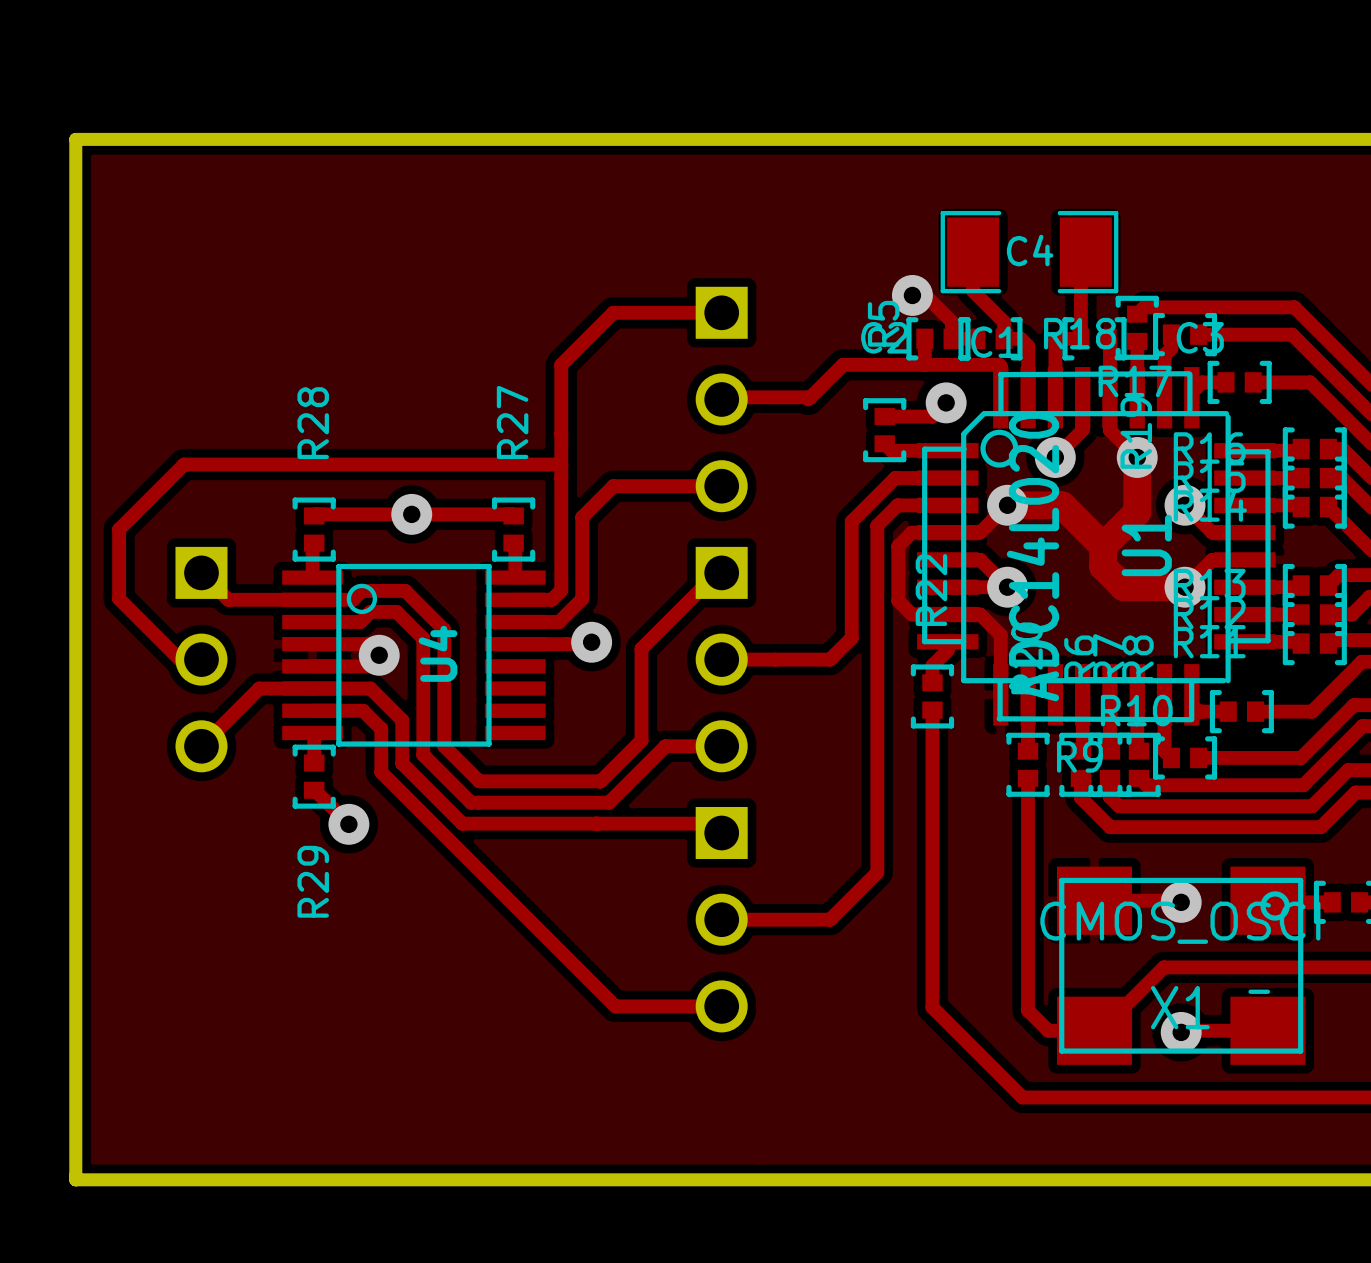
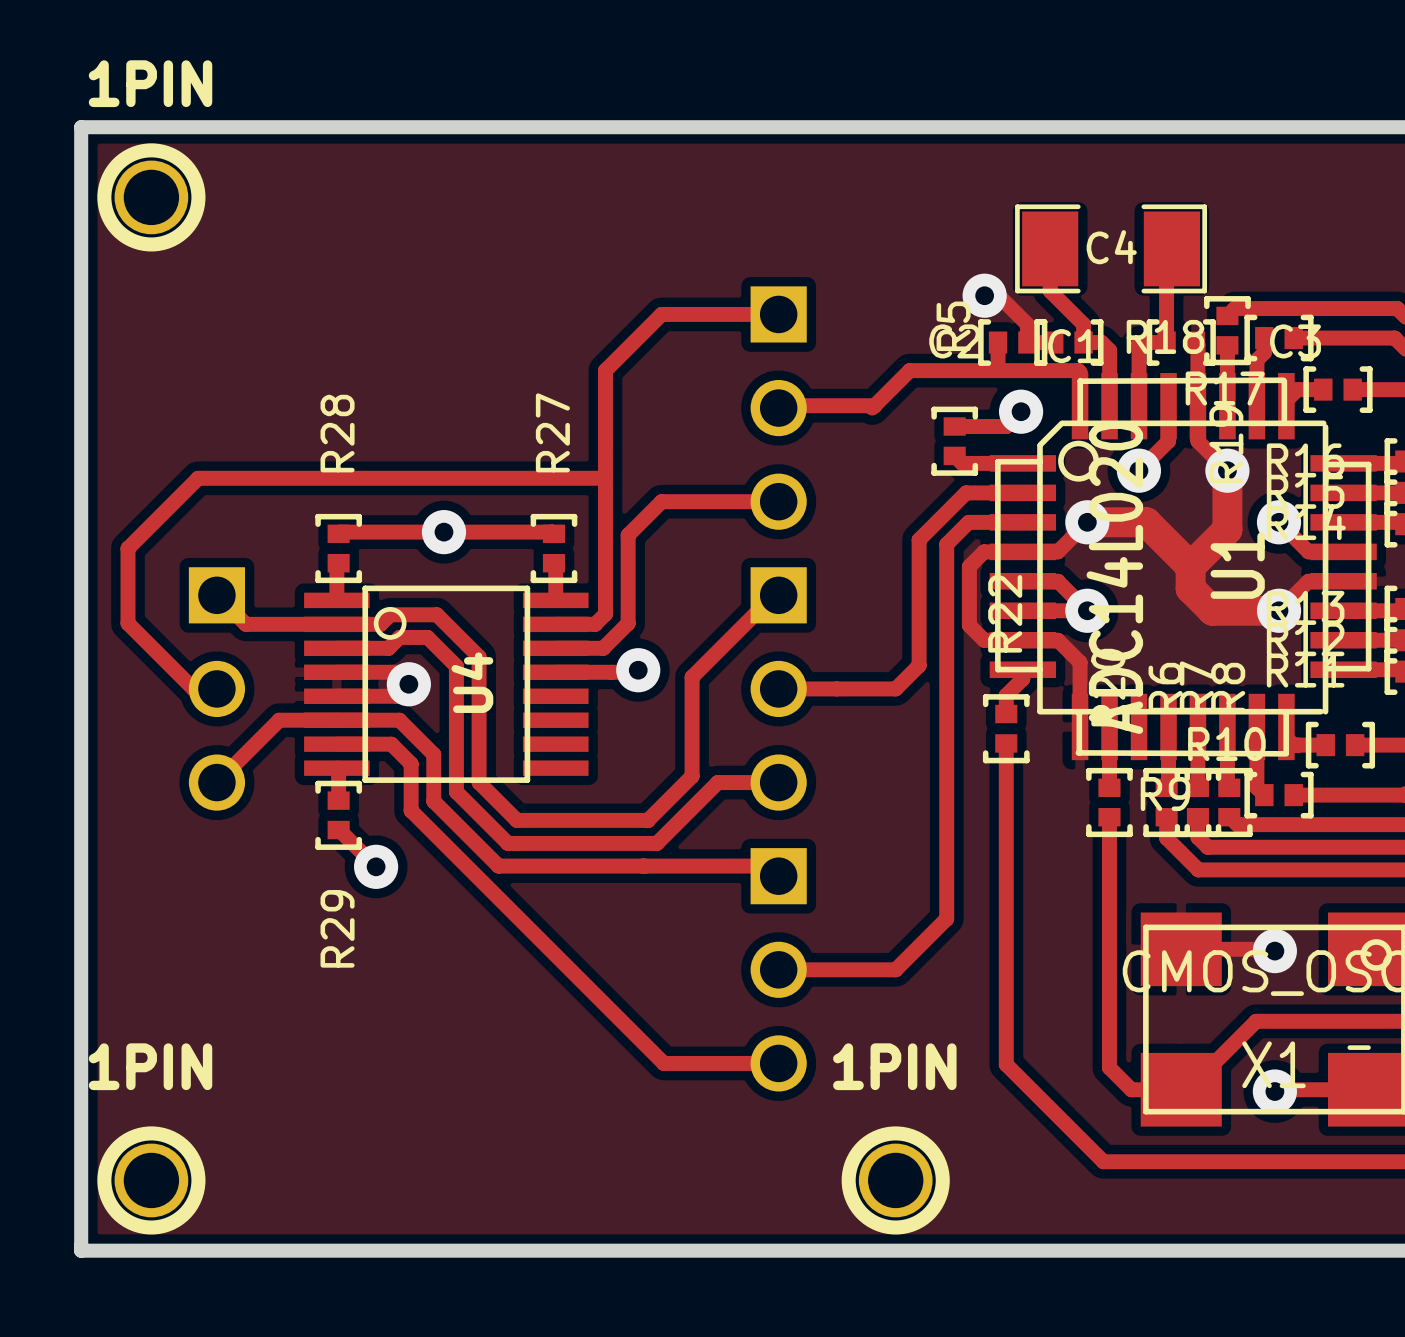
1PIN: none -> (151, 197)
1PIN: none -> (151, 1180)
1PIN: none -> (895, 1180)

